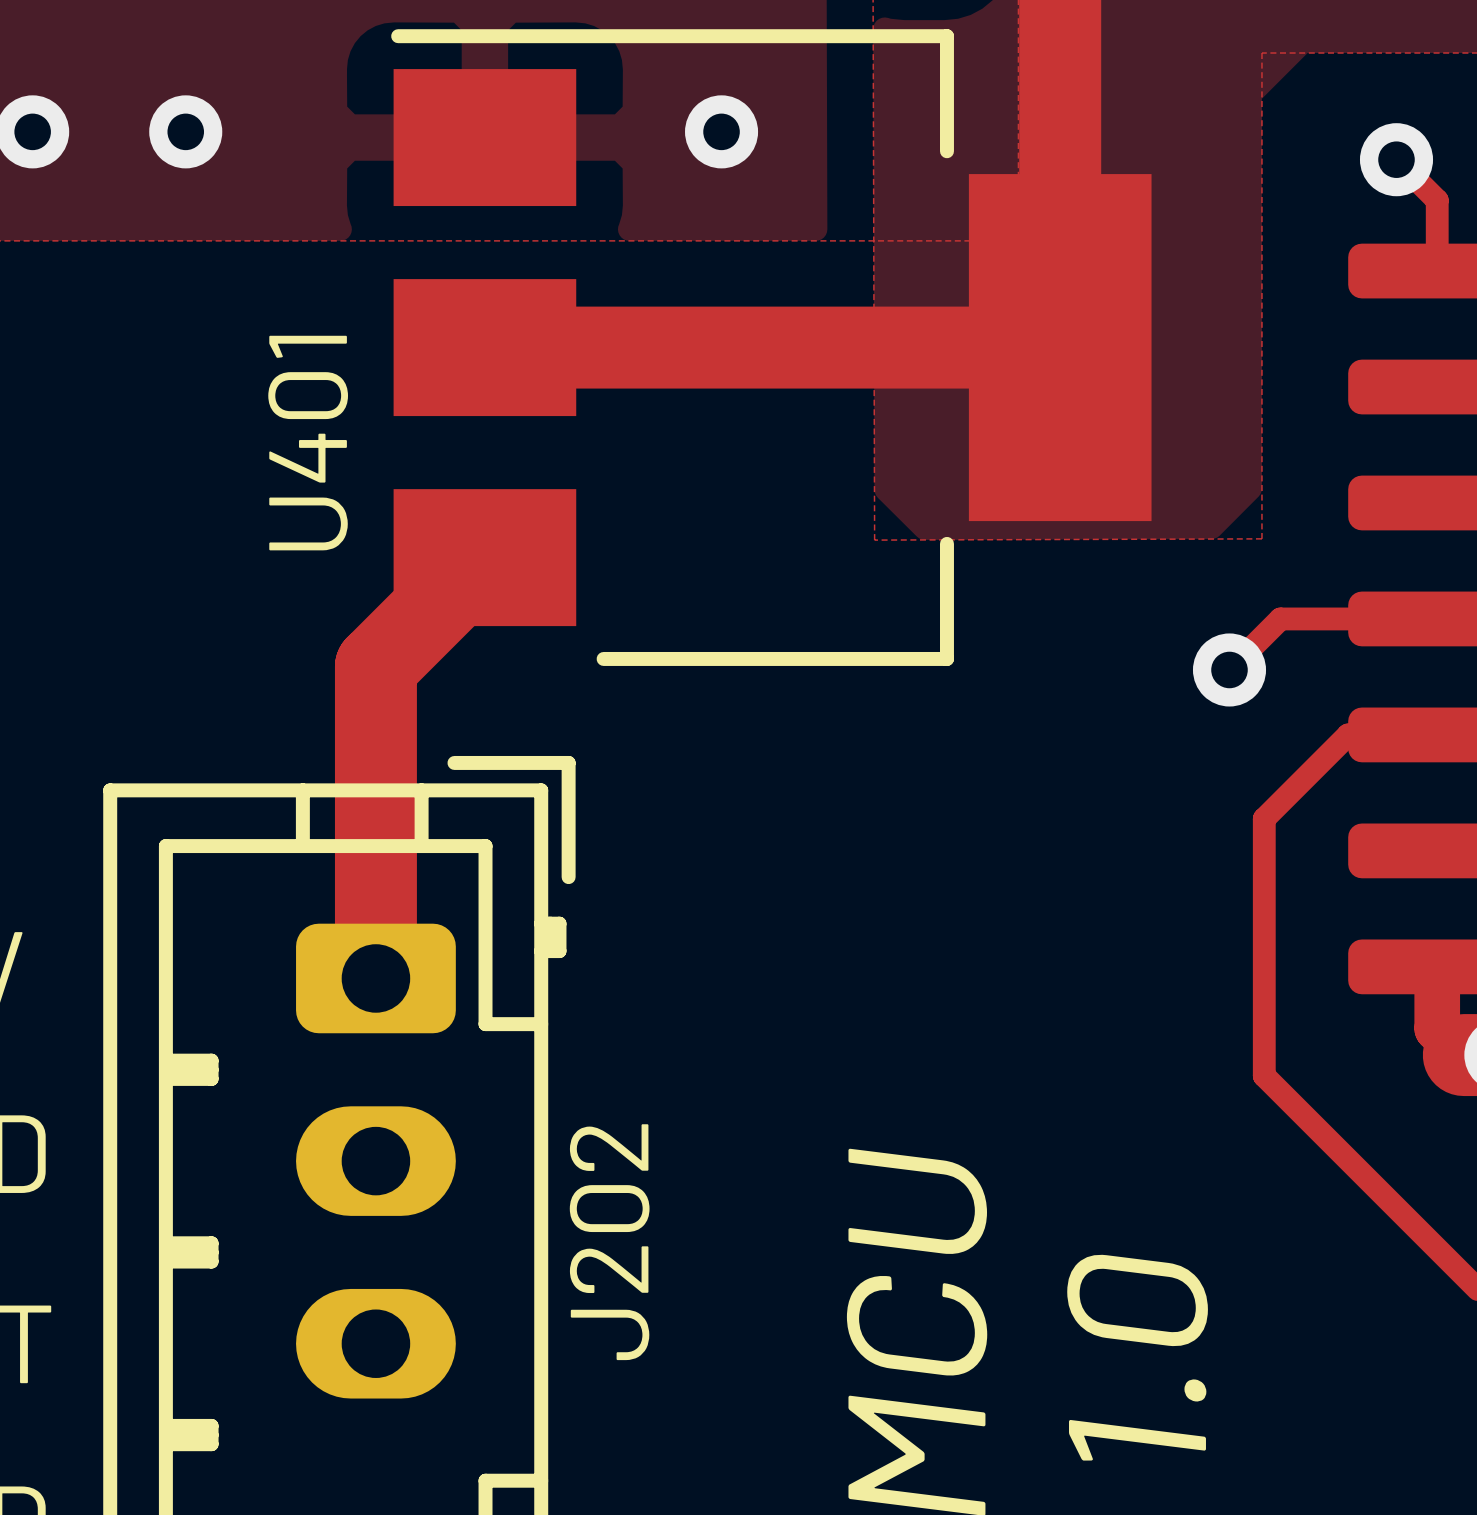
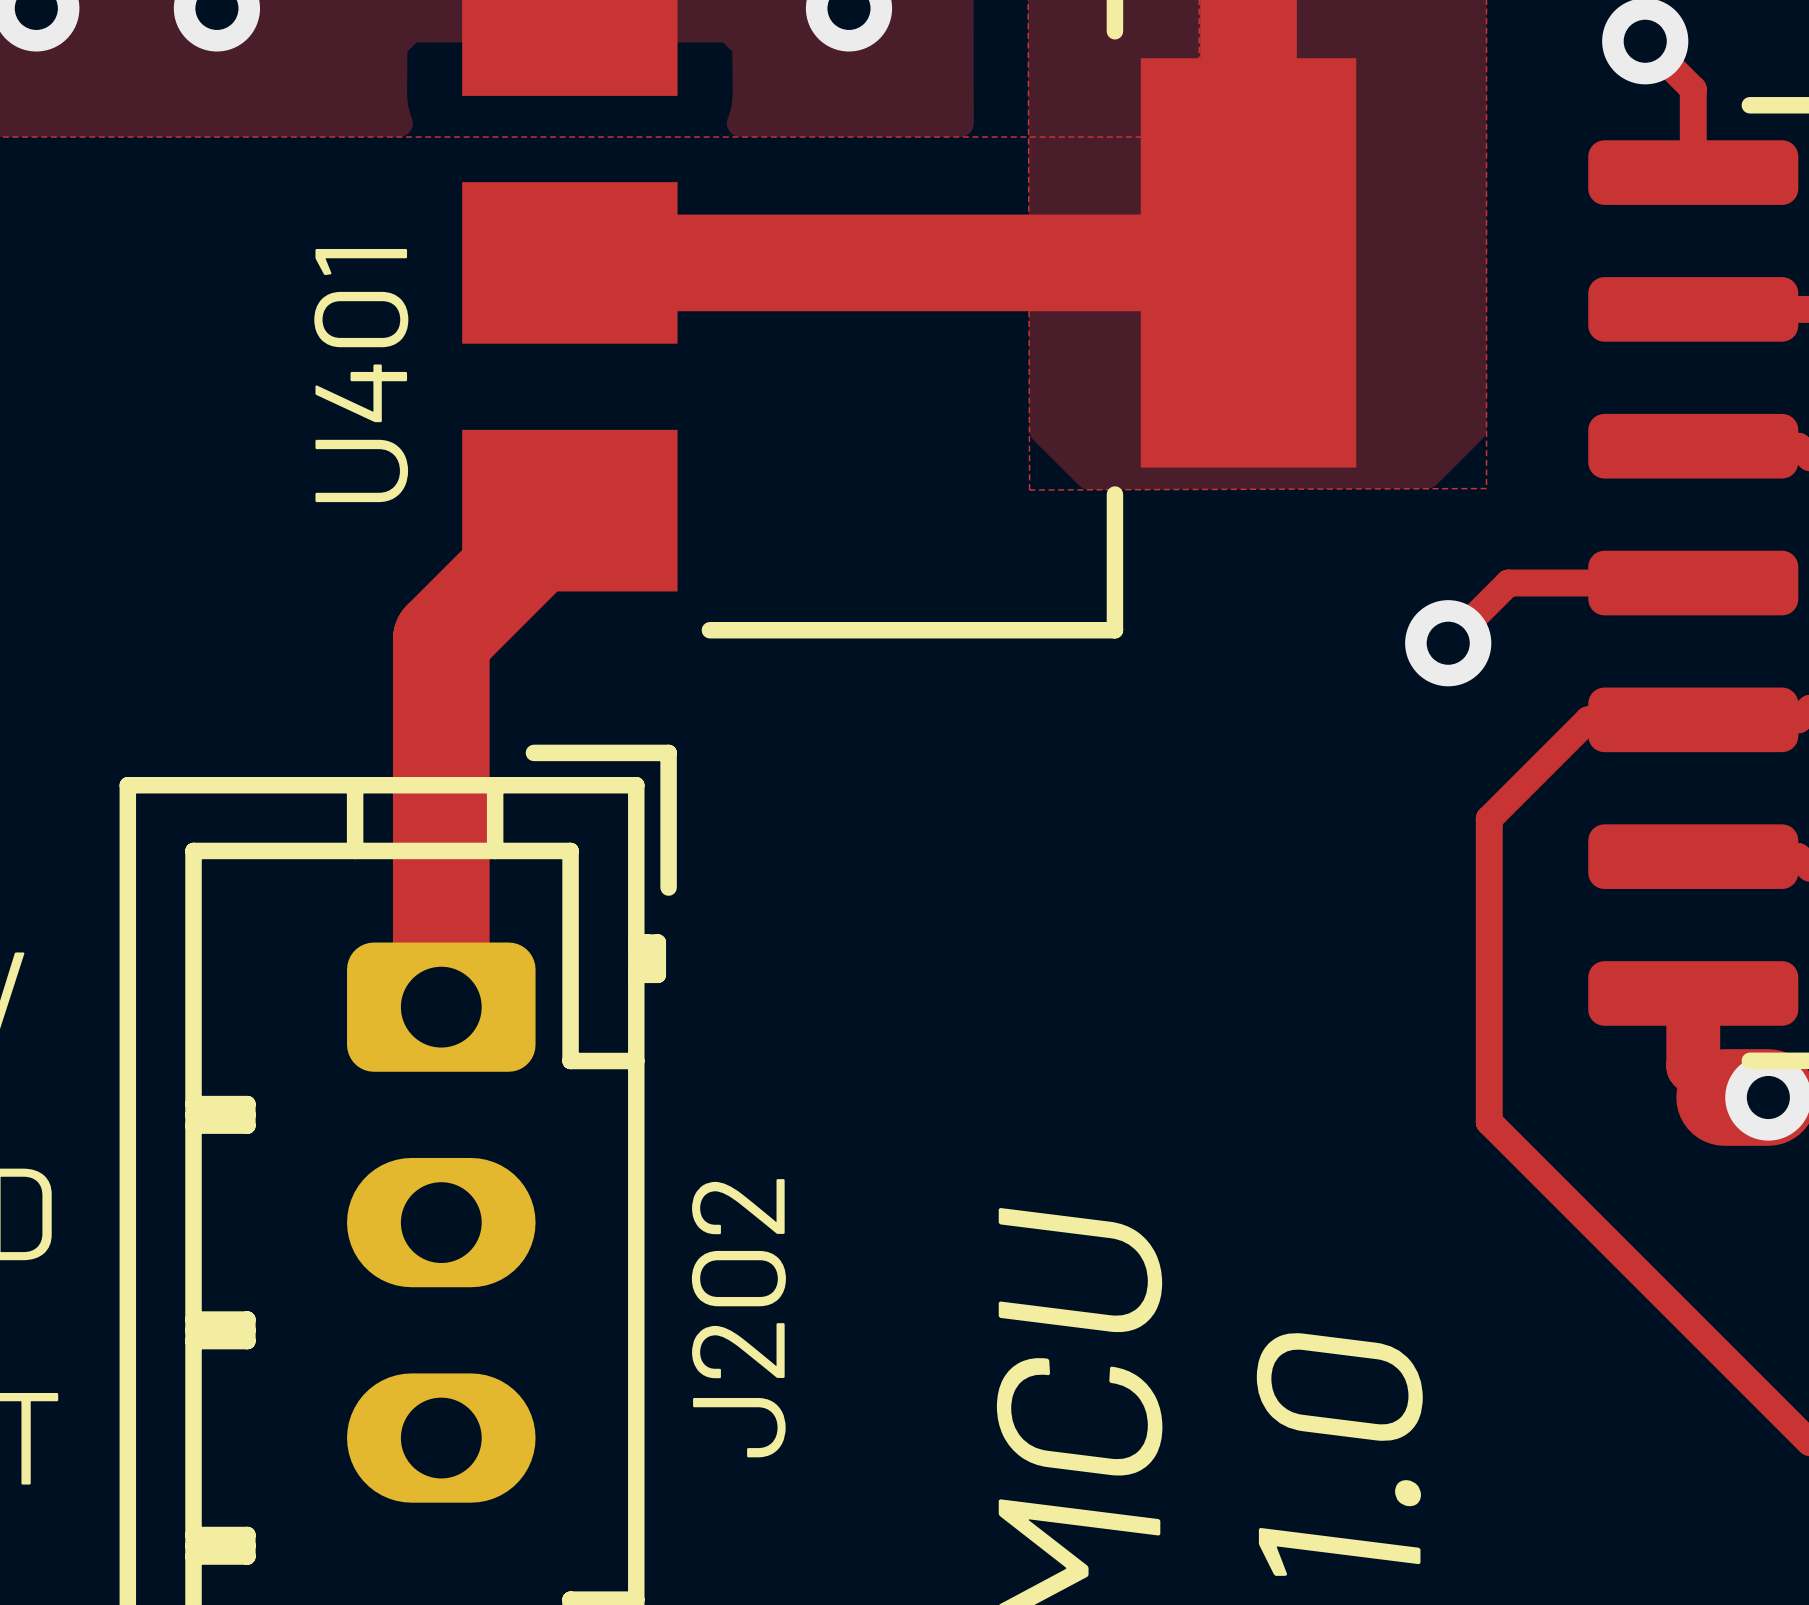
J202 name position: J202 (609, 1242) -> J202 (738, 1318)

